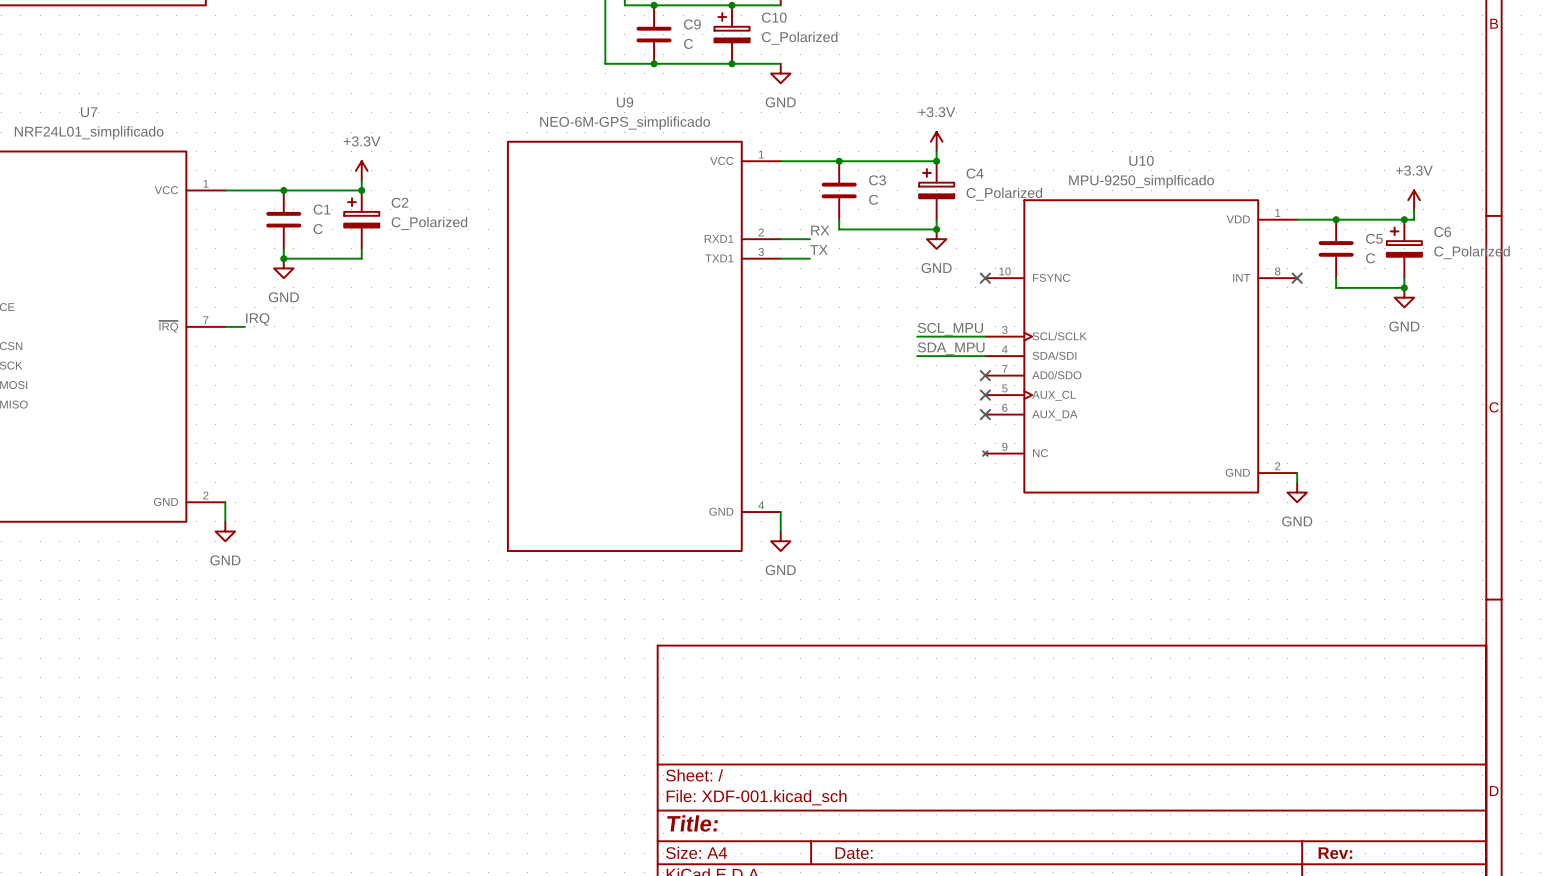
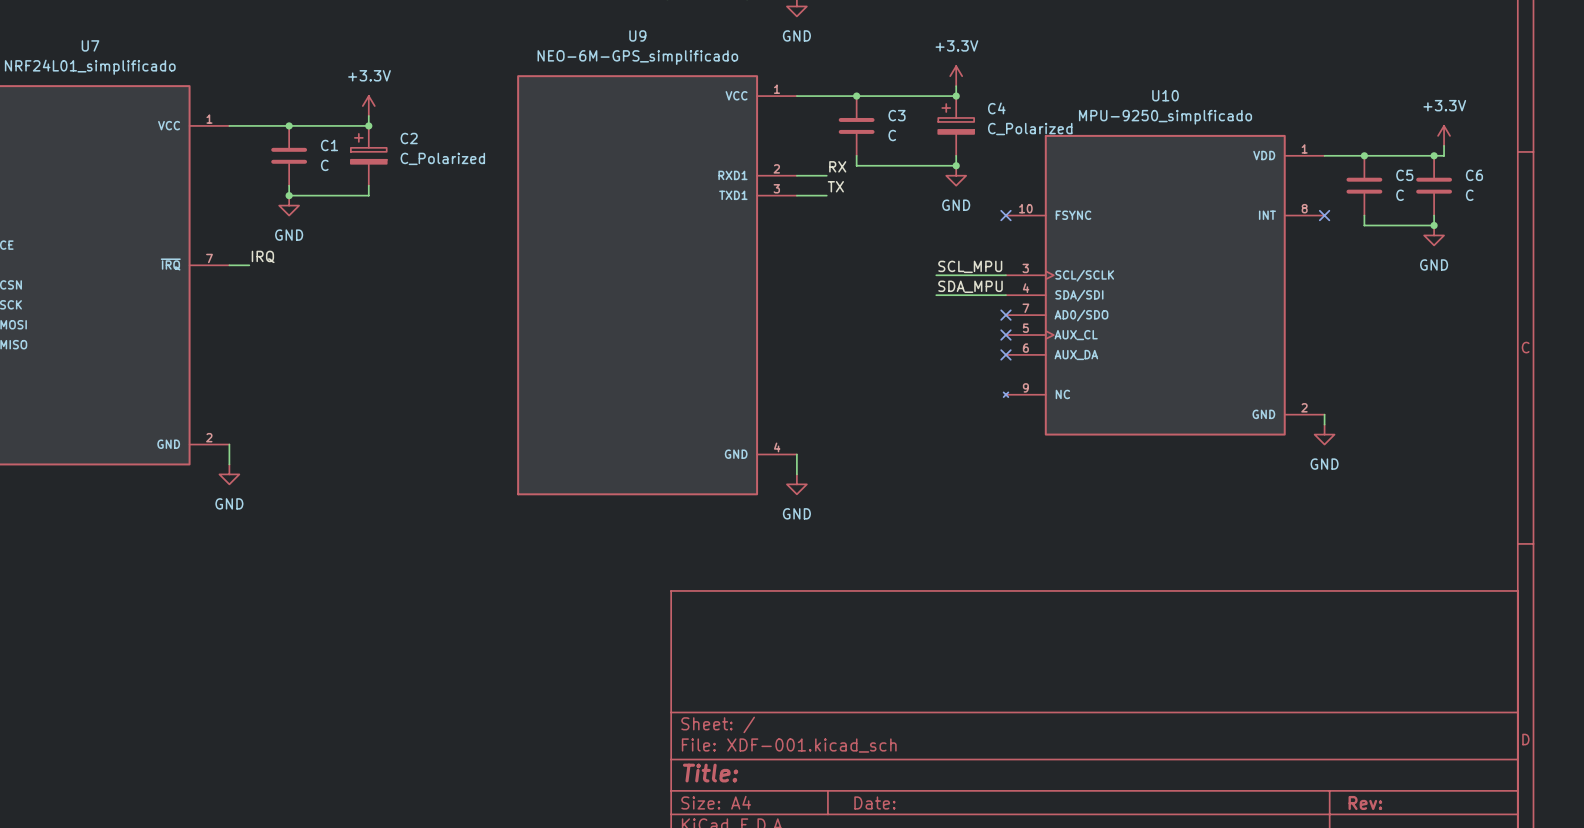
C6 symbol: [1386, 219, 1422, 279] -> [1416, 155, 1453, 216]
C6 value: C_Polarized (1472, 252) -> C (1469, 195)

